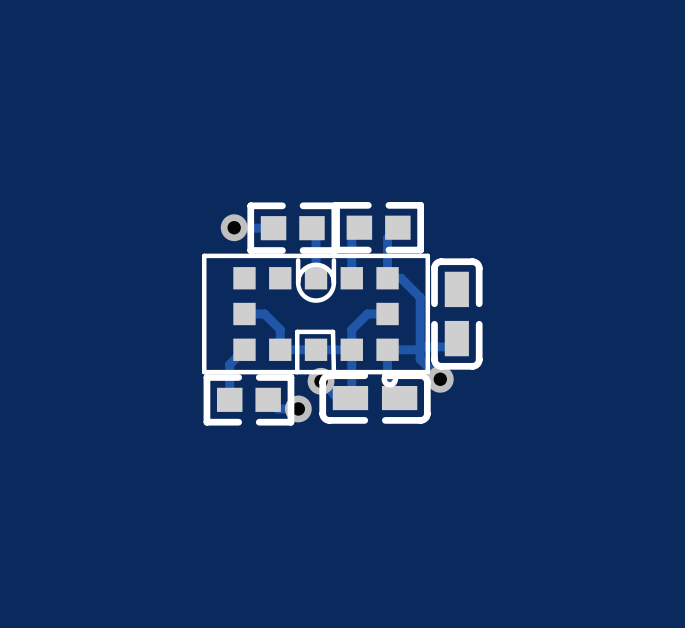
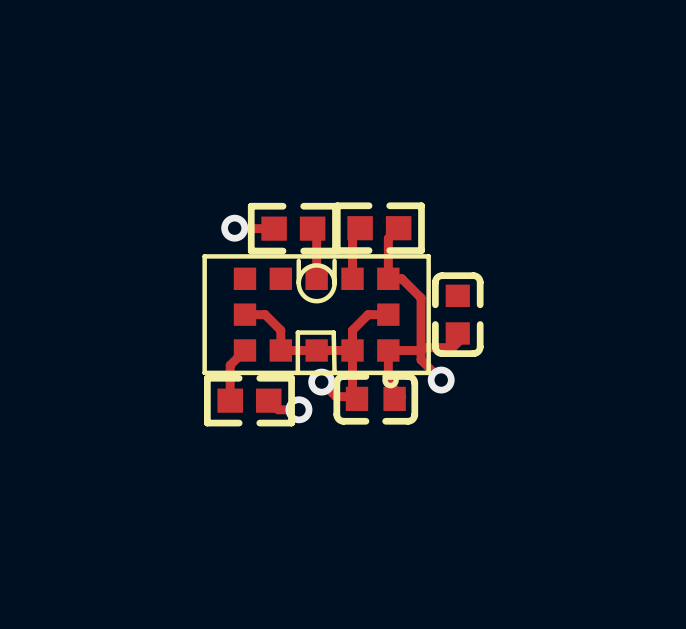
part footprint: [431, 258, 483, 370] -> [432, 272, 484, 357]
part footprint: [319, 372, 431, 424] -> [333, 373, 419, 425]

